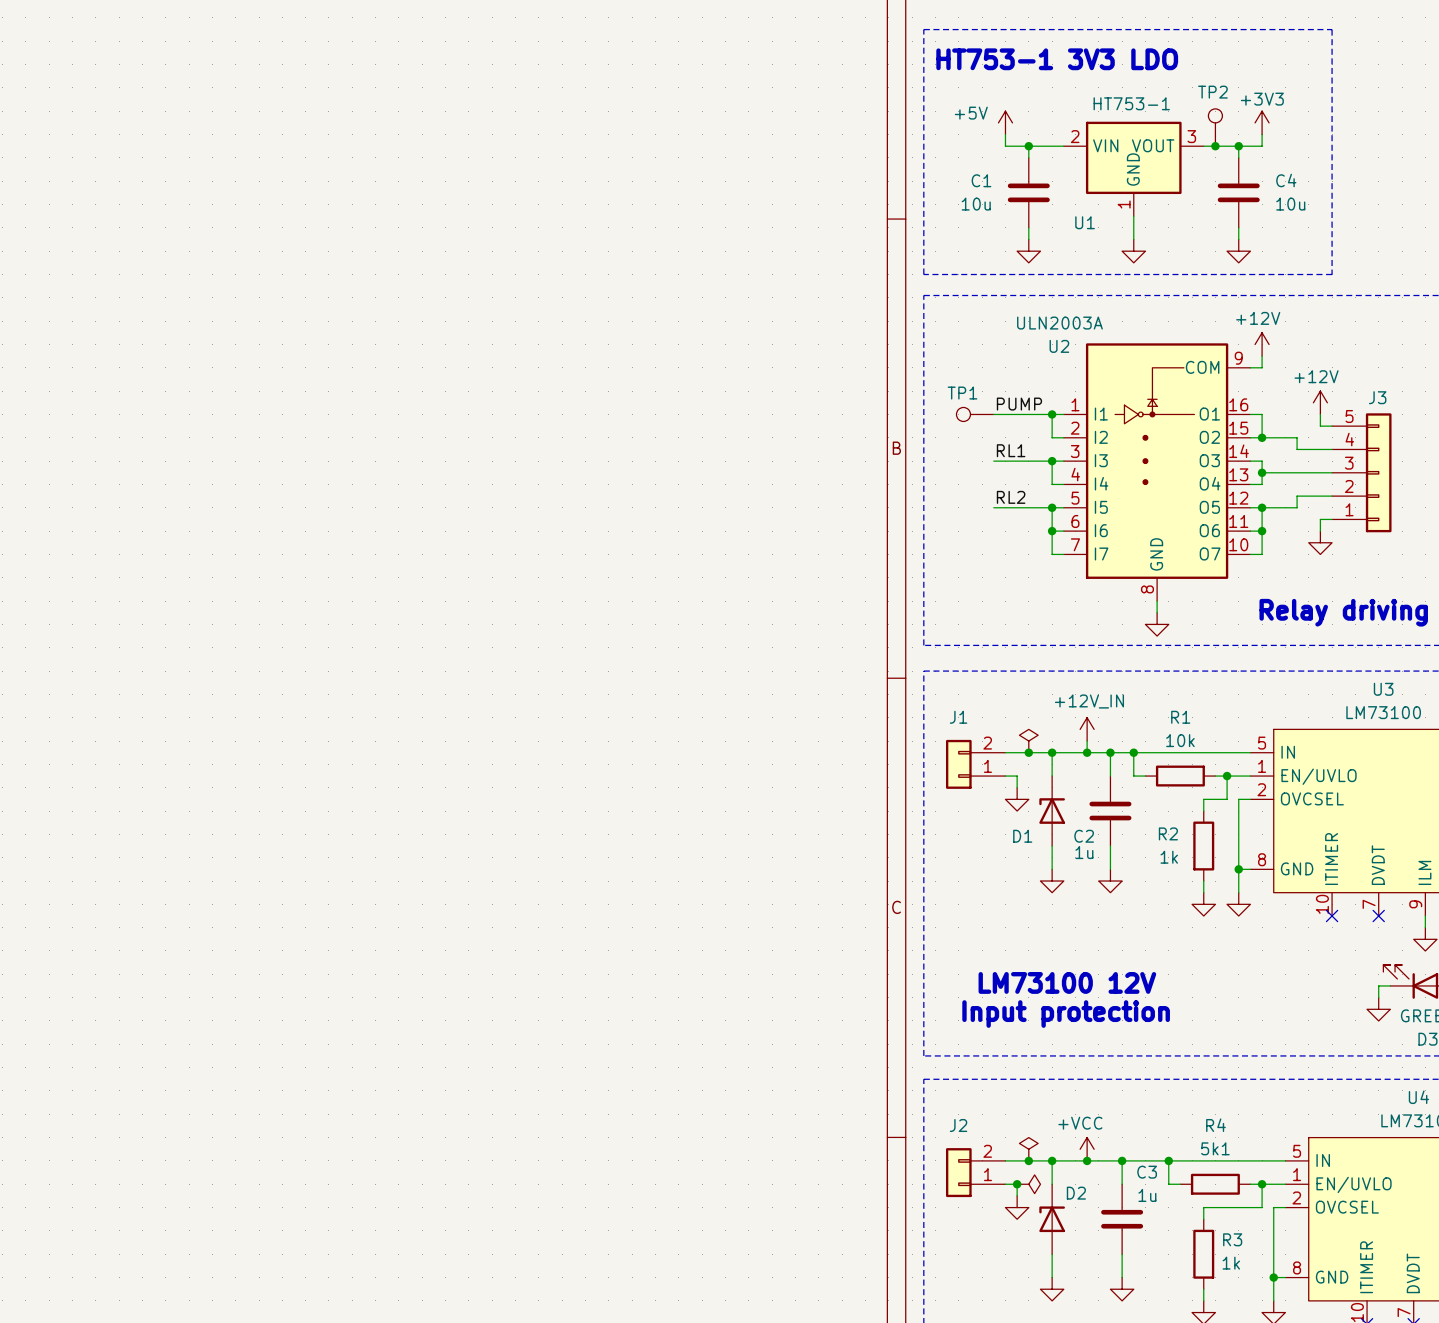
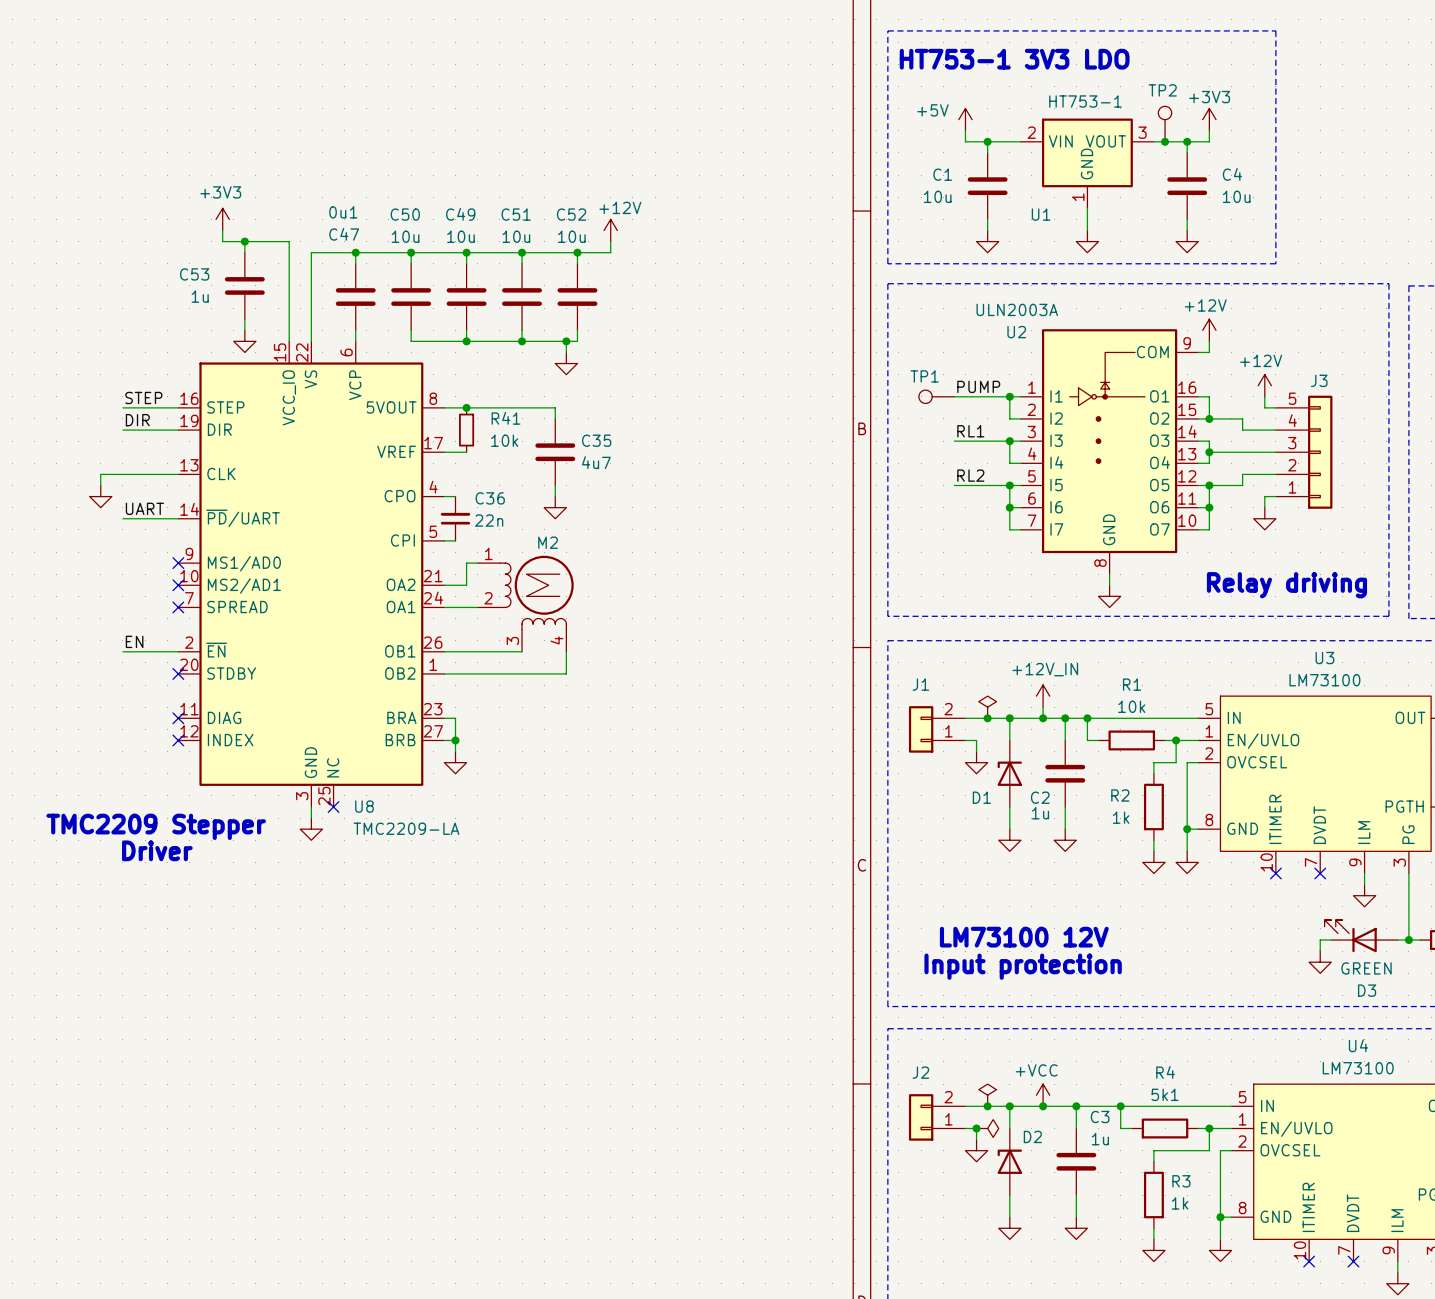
power symbol: none -> +3V3 (222, 219)
wire: none -> (222, 230) (222, 241) (289, 241) (289, 341)
power symbol: none -> +12V (610, 230)
wire: none -> (244, 241) (244, 252)
junction: none -> (244, 241)
wire: none -> (610, 241) (610, 252) (311, 252) (311, 341)
wire: none -> (355, 252) (355, 263)
junction: none -> (355, 252)
wire: none -> (411, 252) (411, 263)
junction: none -> (411, 252)
wire: none -> (466, 252) (466, 263)
junction: none -> (466, 252)
wire: none -> (522, 252) (522, 263)
junction: none -> (522, 252)
wire: none -> (577, 252) (577, 263)
junction: none -> (577, 252)
C53: none -> 1u (244, 285)
C47: none -> 0u1 (355, 297)
C50: none -> 10u (411, 297)
C49: none -> 10u (466, 297)
C51: none -> 10u (522, 297)
C52: none -> 10u (577, 297)
wire: none -> (244, 319) (244, 330)
wire: none -> (355, 330) (355, 341)
wire: none -> (411, 330) (411, 341) (577, 341) (577, 330)
wire: none -> (466, 330) (466, 341)
wire: none -> (522, 330) (522, 341)
power symbol: none -> (244, 341)
junction: none -> (466, 341)
junction: none -> (522, 341)
wire: none -> (566, 341) (566, 352)
junction: none -> (566, 341)
power symbol: none -> (566, 363)
label: none -> STEP (143, 397)
wire: none -> (122, 407) (178, 407)
wire: none -> (444, 407) (555, 407) (555, 418)
junction: none -> (466, 407)
label: none -> DIR (137, 420)
wire: none -> (122, 430) (178, 430)
R41: none -> 10k (466, 430)
wire: none -> (444, 452) (466, 452)
C35: none -> 4u7 (555, 452)
wire: none -> (178, 474) (100, 474) (100, 485)
wire: none -> (555, 485) (555, 496)
power symbol: none -> (100, 496)
wire: none -> (444, 496) (455, 496)
power symbol: none -> (555, 507)
label: none -> UART (144, 508)
wire: none -> (122, 518) (178, 518)
C36: none -> 22n (455, 518)
wire: none -> (444, 540) (455, 540)
no-connect mark: none -> (178, 563)
wire: none -> (477, 563) (466, 563) (466, 585) (444, 585)
U8: none -> TMC2209-LA (311, 574)
no-connect mark: none -> (178, 585)
M2: none -> (525, 603)
no-connect mark: none -> (178, 607)
wire: none -> (444, 607) (477, 607)
label: none -> EN (134, 641)
wire: none -> (122, 651) (178, 651)
wire: none -> (444, 651) (522, 651)
wire: none -> (566, 651) (566, 673) (444, 673)
no-connect mark: none -> (178, 673)
no-connect mark: none -> (178, 718)
wire: none -> (444, 718) (455, 718) (455, 751)
no-connect mark: none -> (178, 740)
wire: none -> (444, 740) (455, 740)
junction: none -> (455, 740)
power symbol: none -> (455, 762)
wire: none -> (311, 806) (311, 818)
no-connect mark: none -> (333, 806)
text: none -> TMC2209 Stepper (156, 826)
power symbol: none -> (311, 829)
text: none -> Driver (157, 850)

